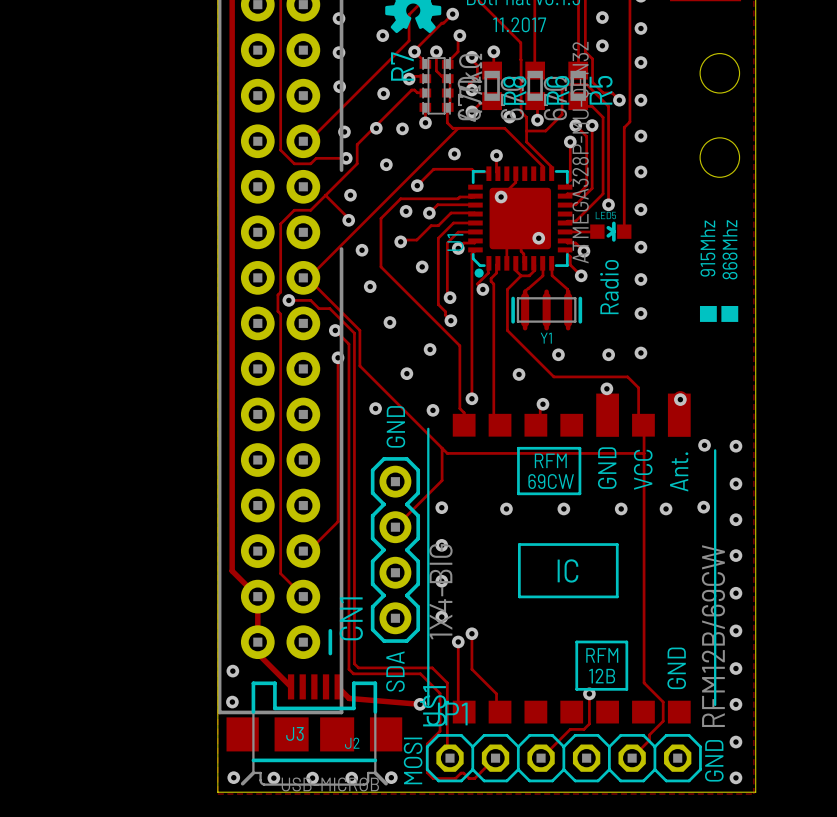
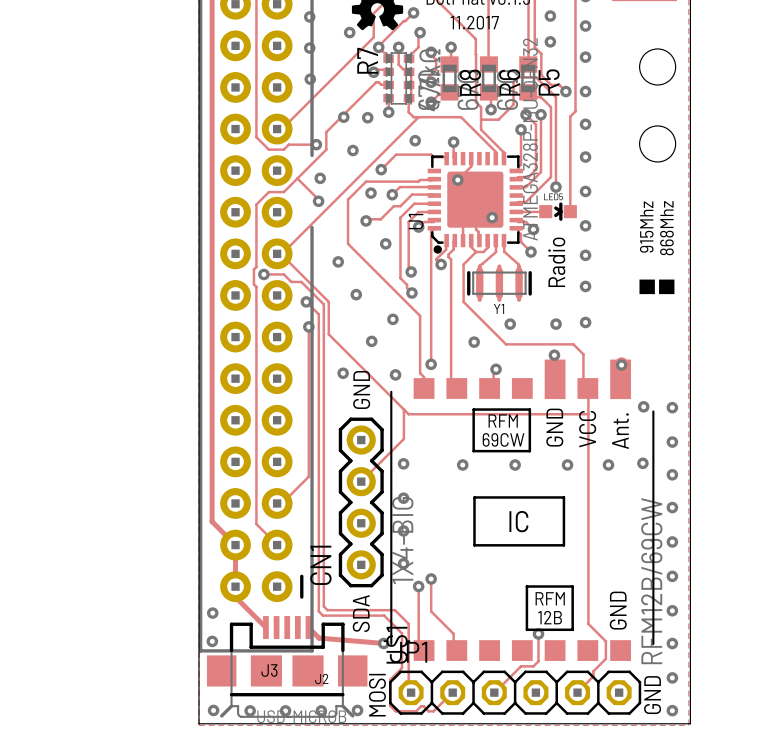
via: (383, 93) -> none
via: (509, 117) -> none
via: (344, 131) -> none
via: (362, 250) -> none

